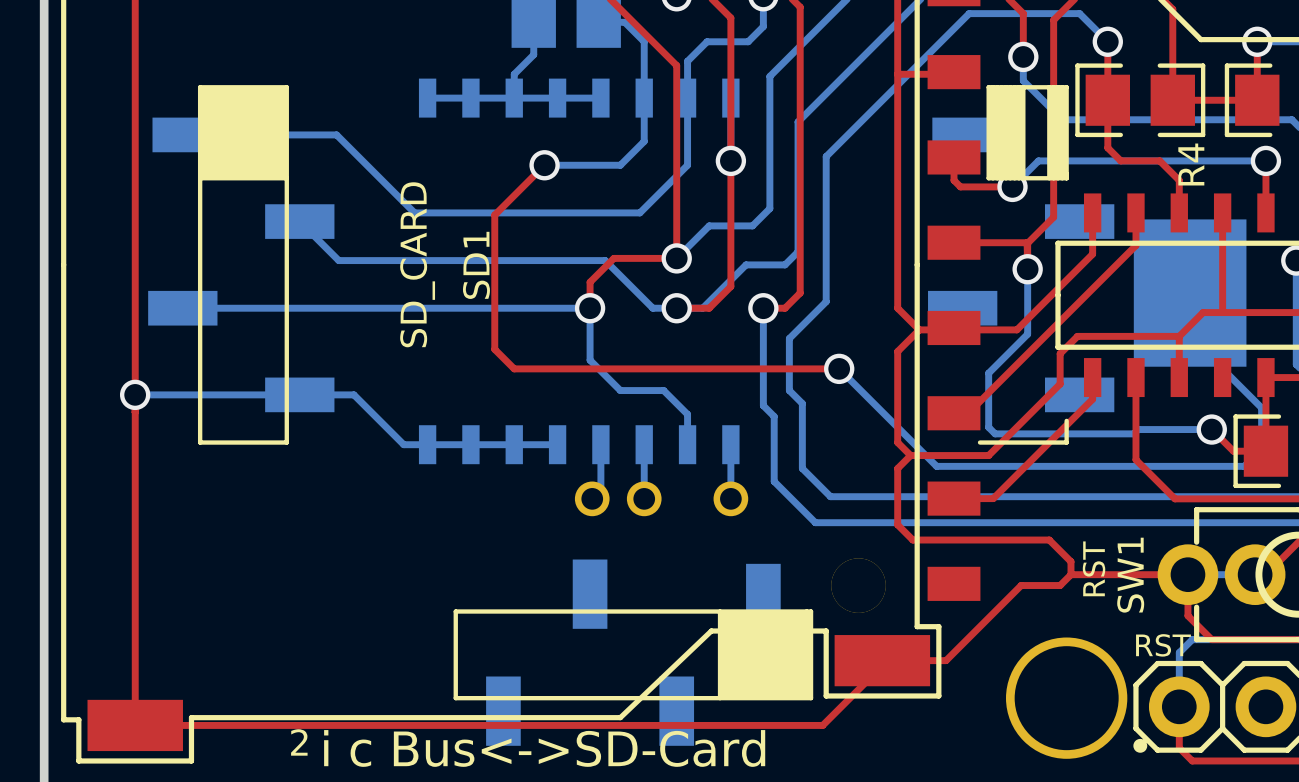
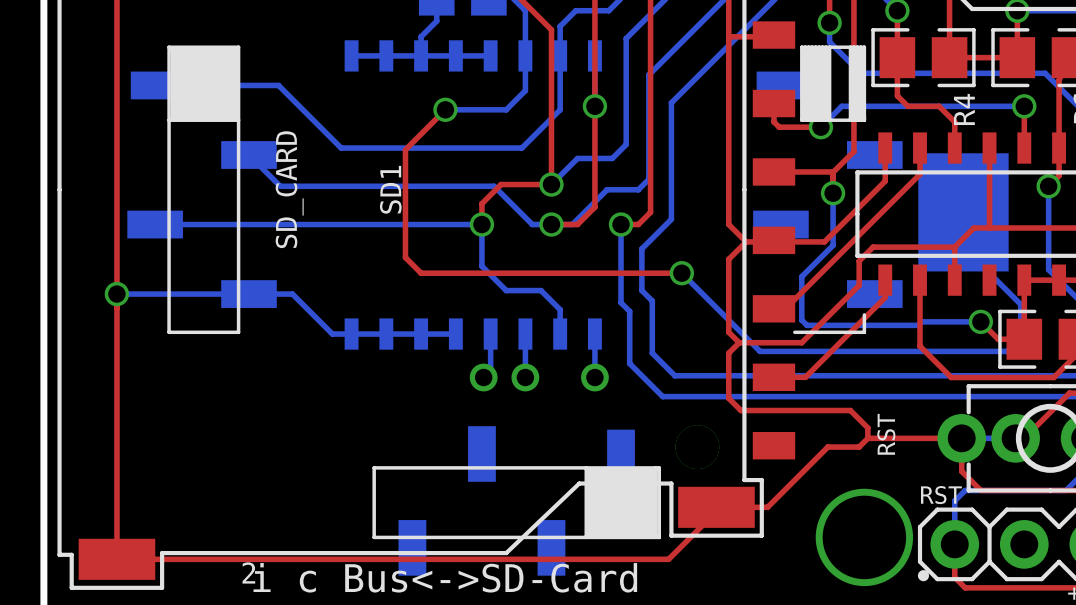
SD1 value position: SD_CARD (417, 264) -> SD_CARD (289, 189)
SW1 name: SW1 (1130, 575) -> none

